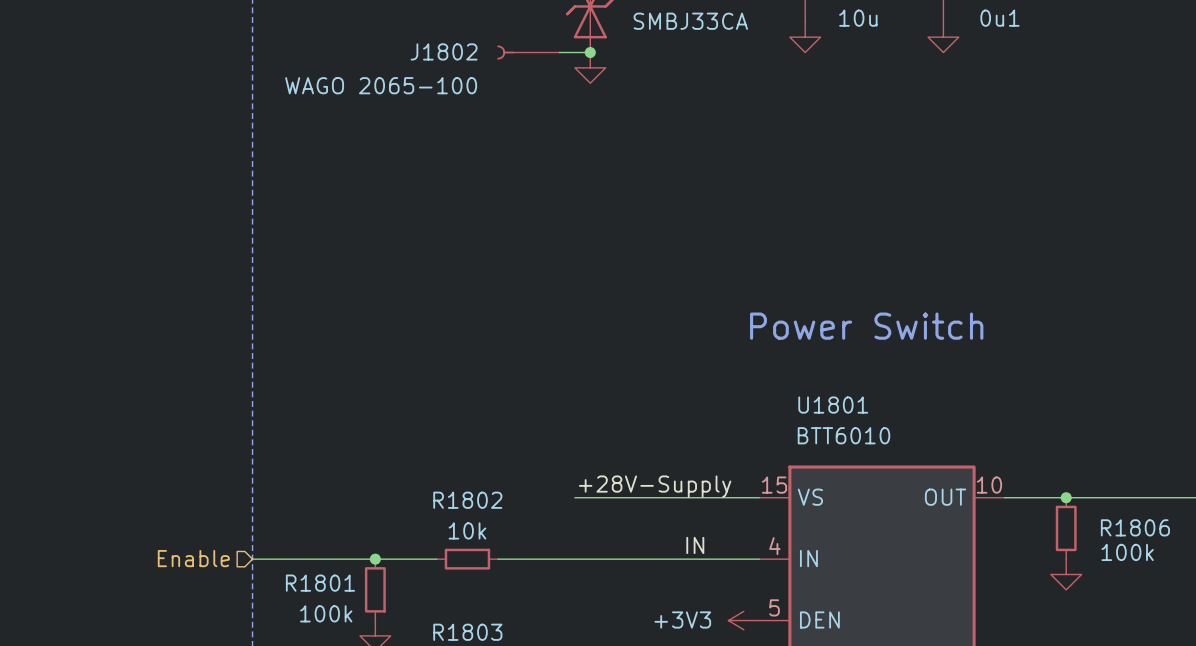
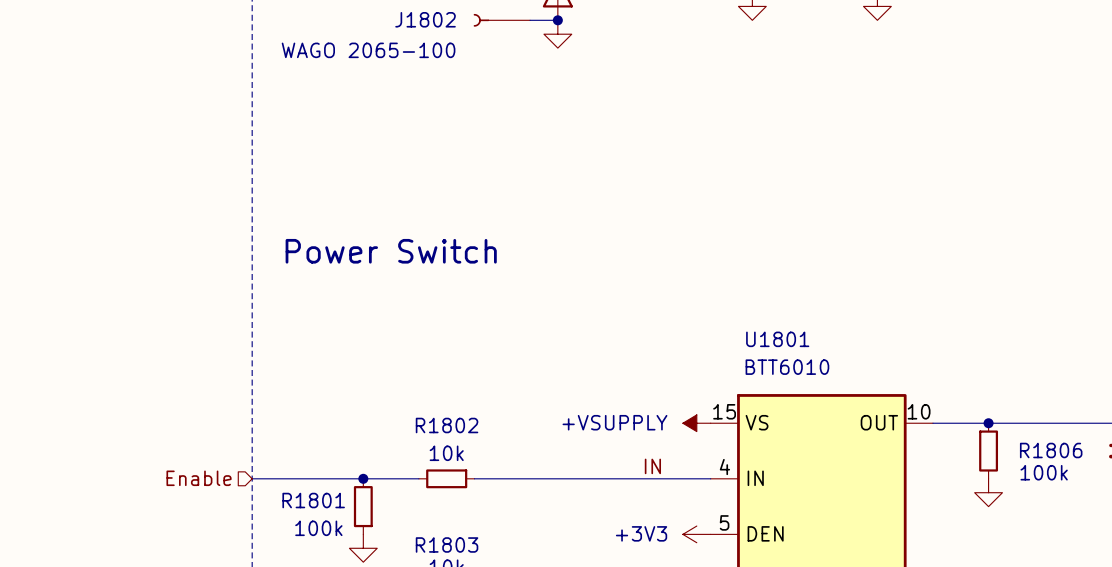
text: none -> Power Switch (391, 251)
text: Power Switch (866, 326) -> none
label: +28V-Supply (655, 486) -> none
wire: (574, 497) (759, 497) -> none
power symbol: none -> +VSUPPLY (696, 423)

